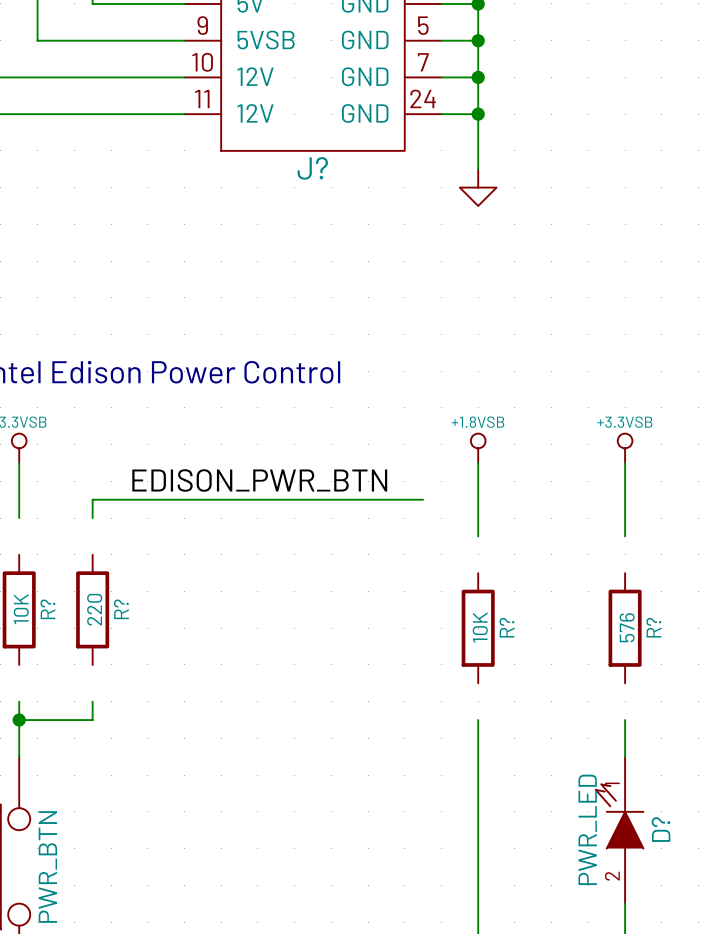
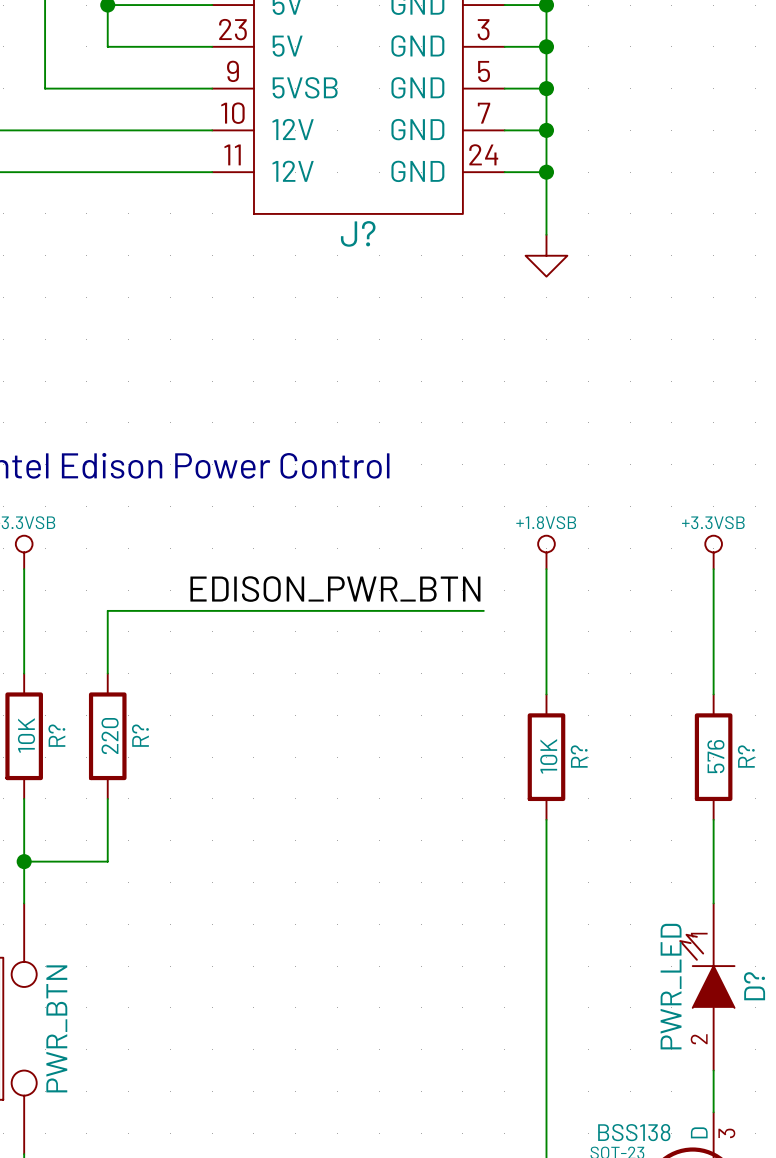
label position: EDISON_PWR_BTN (259, 480) -> EDISON_PWR_BTN (335, 589)
wire: none -> (24, 631) (24, 673)
wire: none -> (107, 631) (107, 673)
wire: none -> (546, 652) (546, 694)
wire: none -> (713, 652) (713, 694)
wire: none -> (24, 798) (24, 840)
wire: none -> (107, 798) (107, 840)
wire: none -> (546, 819) (546, 861)
wire: none -> (713, 819) (713, 861)

